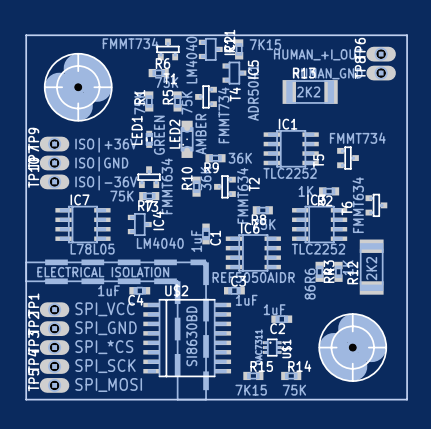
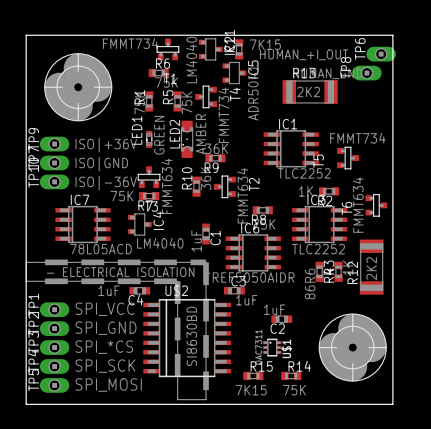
board edge: (392, 35) (407, 35) (407, 399) (26, 399) -> (392, 35) (392, 404) (26, 404) (26, 399)
text position: HUMAN_+I_OUT (318, 54) -> HUMAN_+I_OUT (304, 54)
TP8 position: (381, 73) -> (366, 73)
R9 value position: 36K (240, 158) -> 36K (216, 148)
IC1 value position: TLC2252 (290, 173) -> TLC2252 (304, 173)
IC7 value: L78L05 (92, 249) -> 78L05ACD (100, 249)
text: ELECTRICAL ISOLATION (103, 272) -> - ELECTRICAL ISOLATION - (128, 272)

